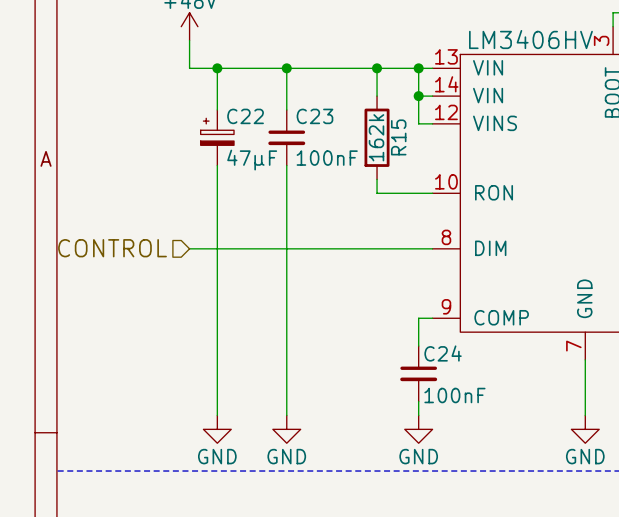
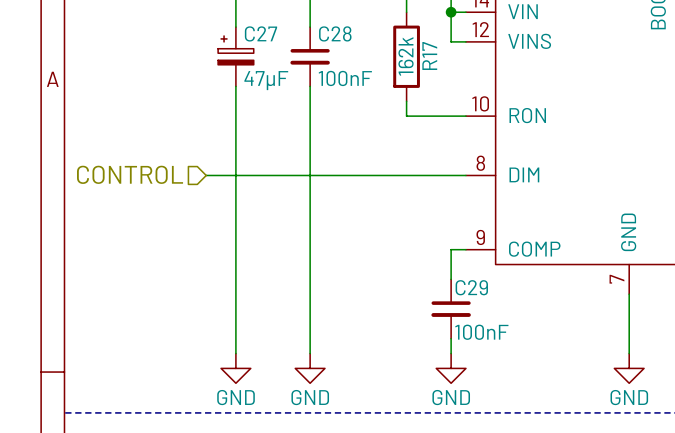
C22 name: C22 (245, 116) -> C27 (261, 33)
C23 name: C23 (314, 116) -> C28 (335, 33)
R15 name: R15 (398, 137) -> R17 (429, 55)
C24 name: C24 (443, 353) -> C29 (471, 287)

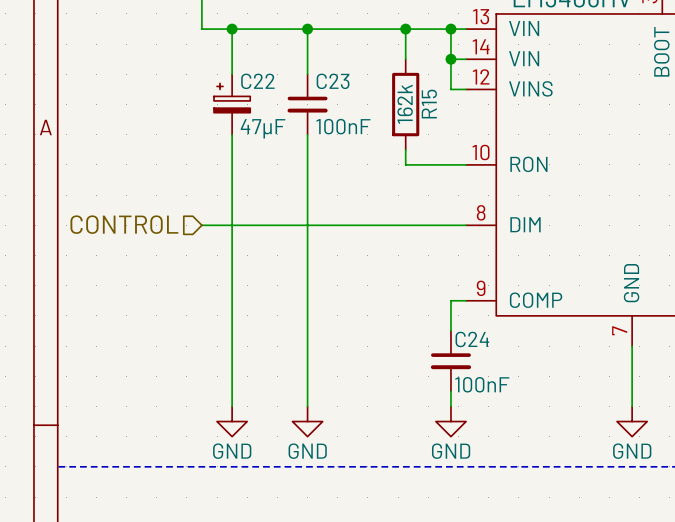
C27 name: C27 (261, 33) -> C22 (257, 81)
C28 name: C28 (335, 33) -> C23 (333, 81)
R17 name: R17 (429, 55) -> R15 (429, 104)
C29 name: C29 (471, 287) -> C24 (472, 339)

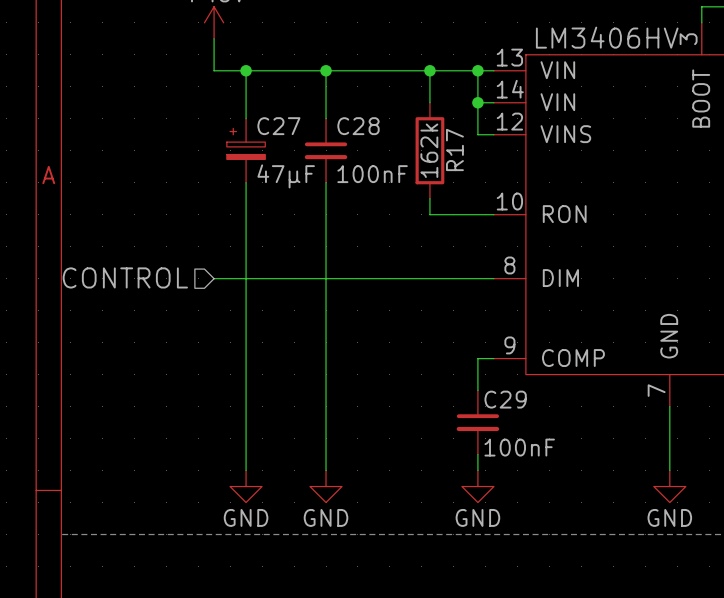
C22 name: C22 (257, 81) -> C27 (278, 126)
C23 name: C23 (333, 81) -> C28 (358, 126)
R15 name: R15 (429, 104) -> R17 (454, 149)
C24 name: C24 (472, 339) -> C29 (505, 399)

